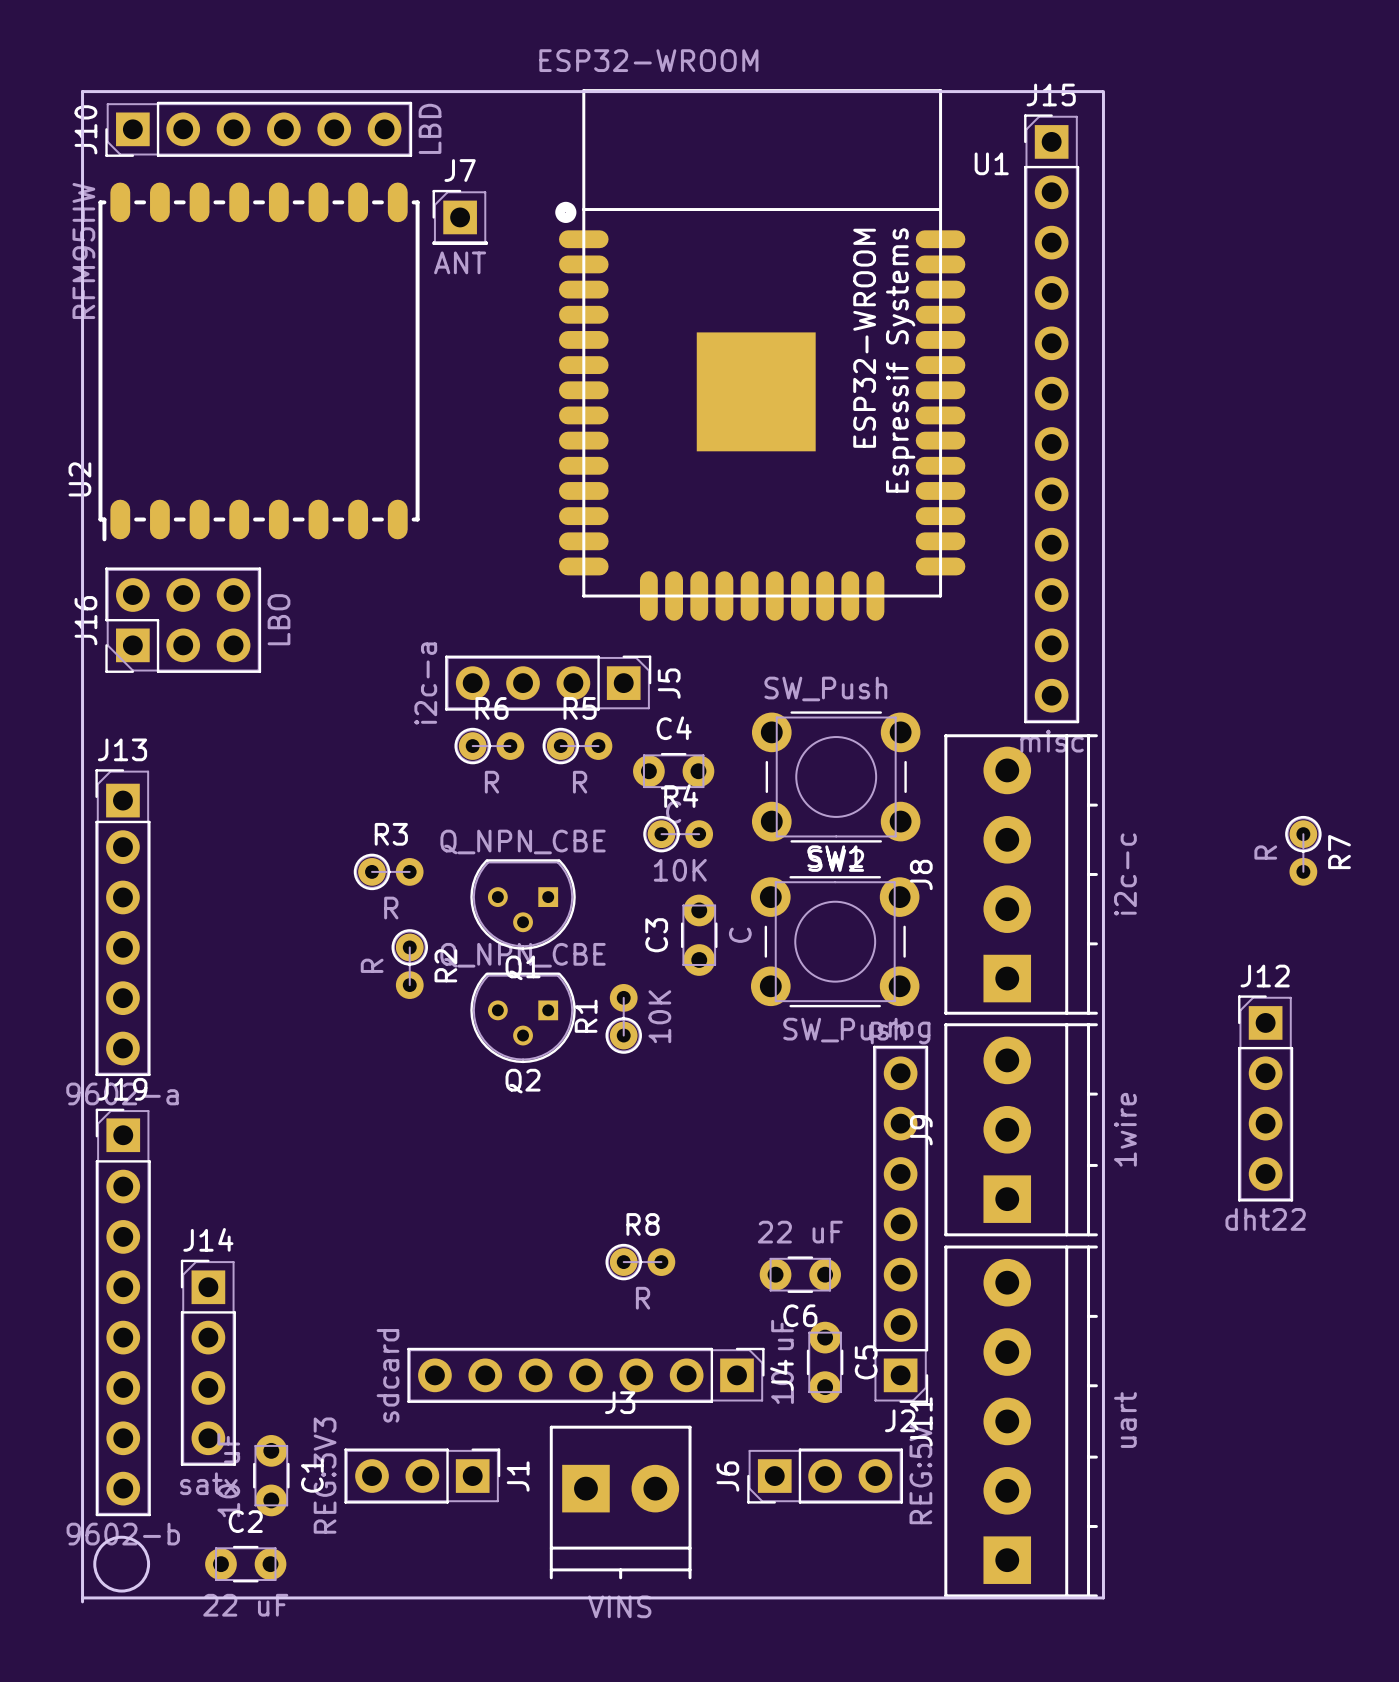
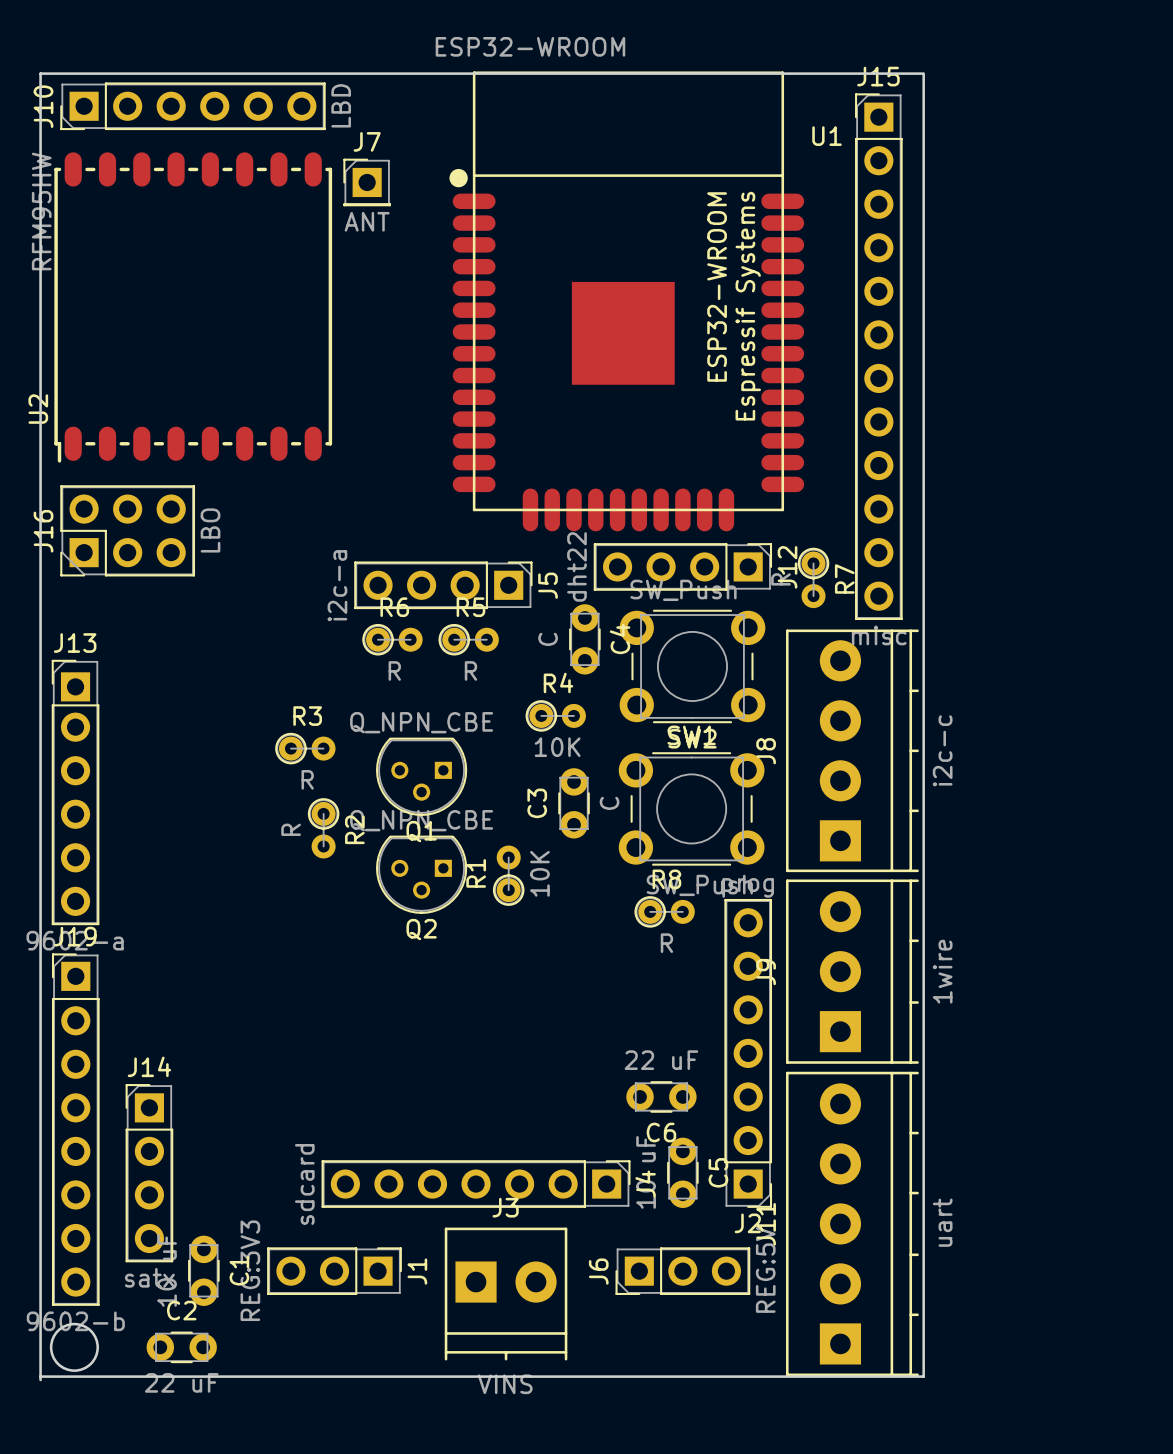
C4 rotation: 0° (673, 771) -> 90° clockwise (584, 639)
R7 position: (1303, 850) -> (813, 577)
J12 rotation: 0° (1265, 1098) -> 90° clockwise (682, 566)
J12 position: (1265, 1098) -> (682, 566)
R8 position: (640, 1262) -> (664, 911)

